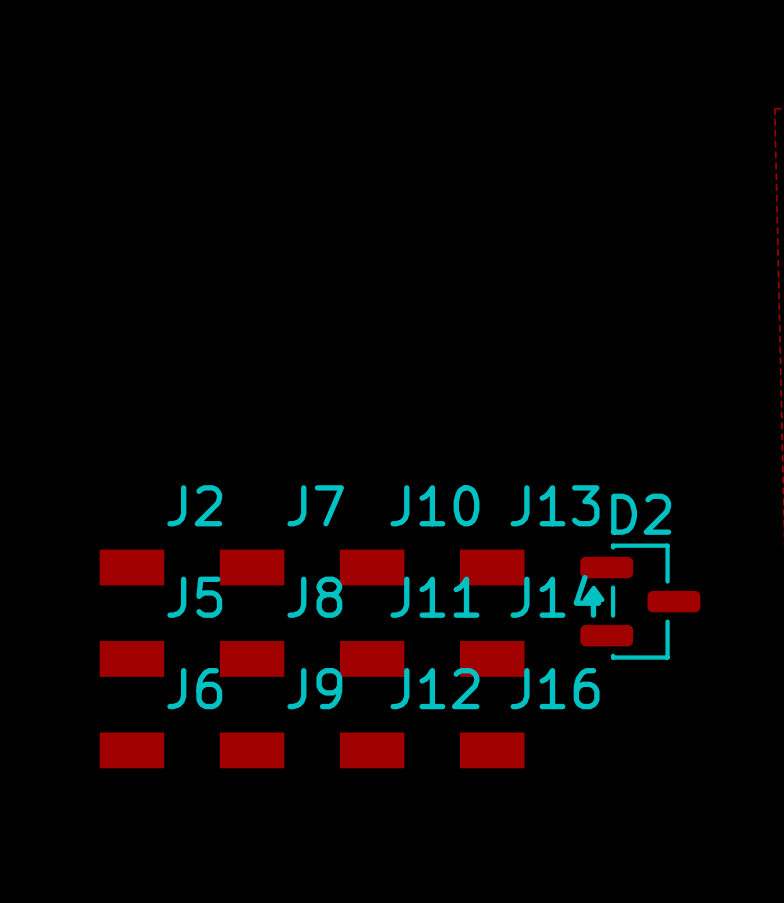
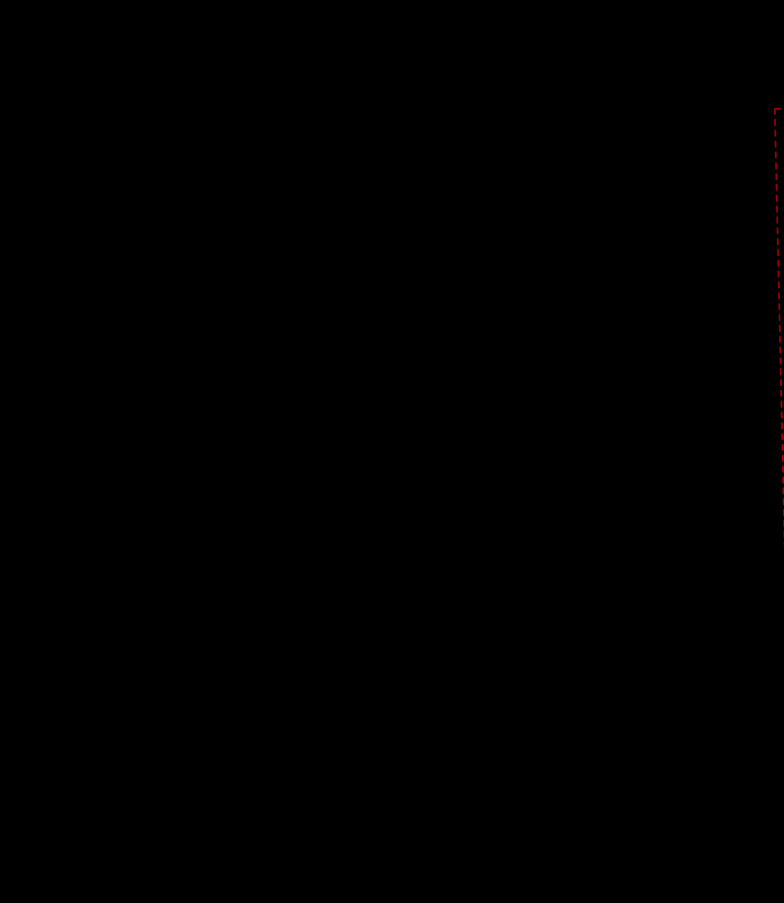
J2: (131, 567) -> none
J7: (252, 567) -> none
J10: (372, 567) -> none
J13: (492, 567) -> none
D2: (640, 601) -> none
J5: (131, 658) -> none
J8: (252, 658) -> none
J11: (372, 658) -> none
J14: (492, 658) -> none
J6: (131, 750) -> none
J9: (252, 750) -> none
J12: (372, 750) -> none
J16: (492, 750) -> none

